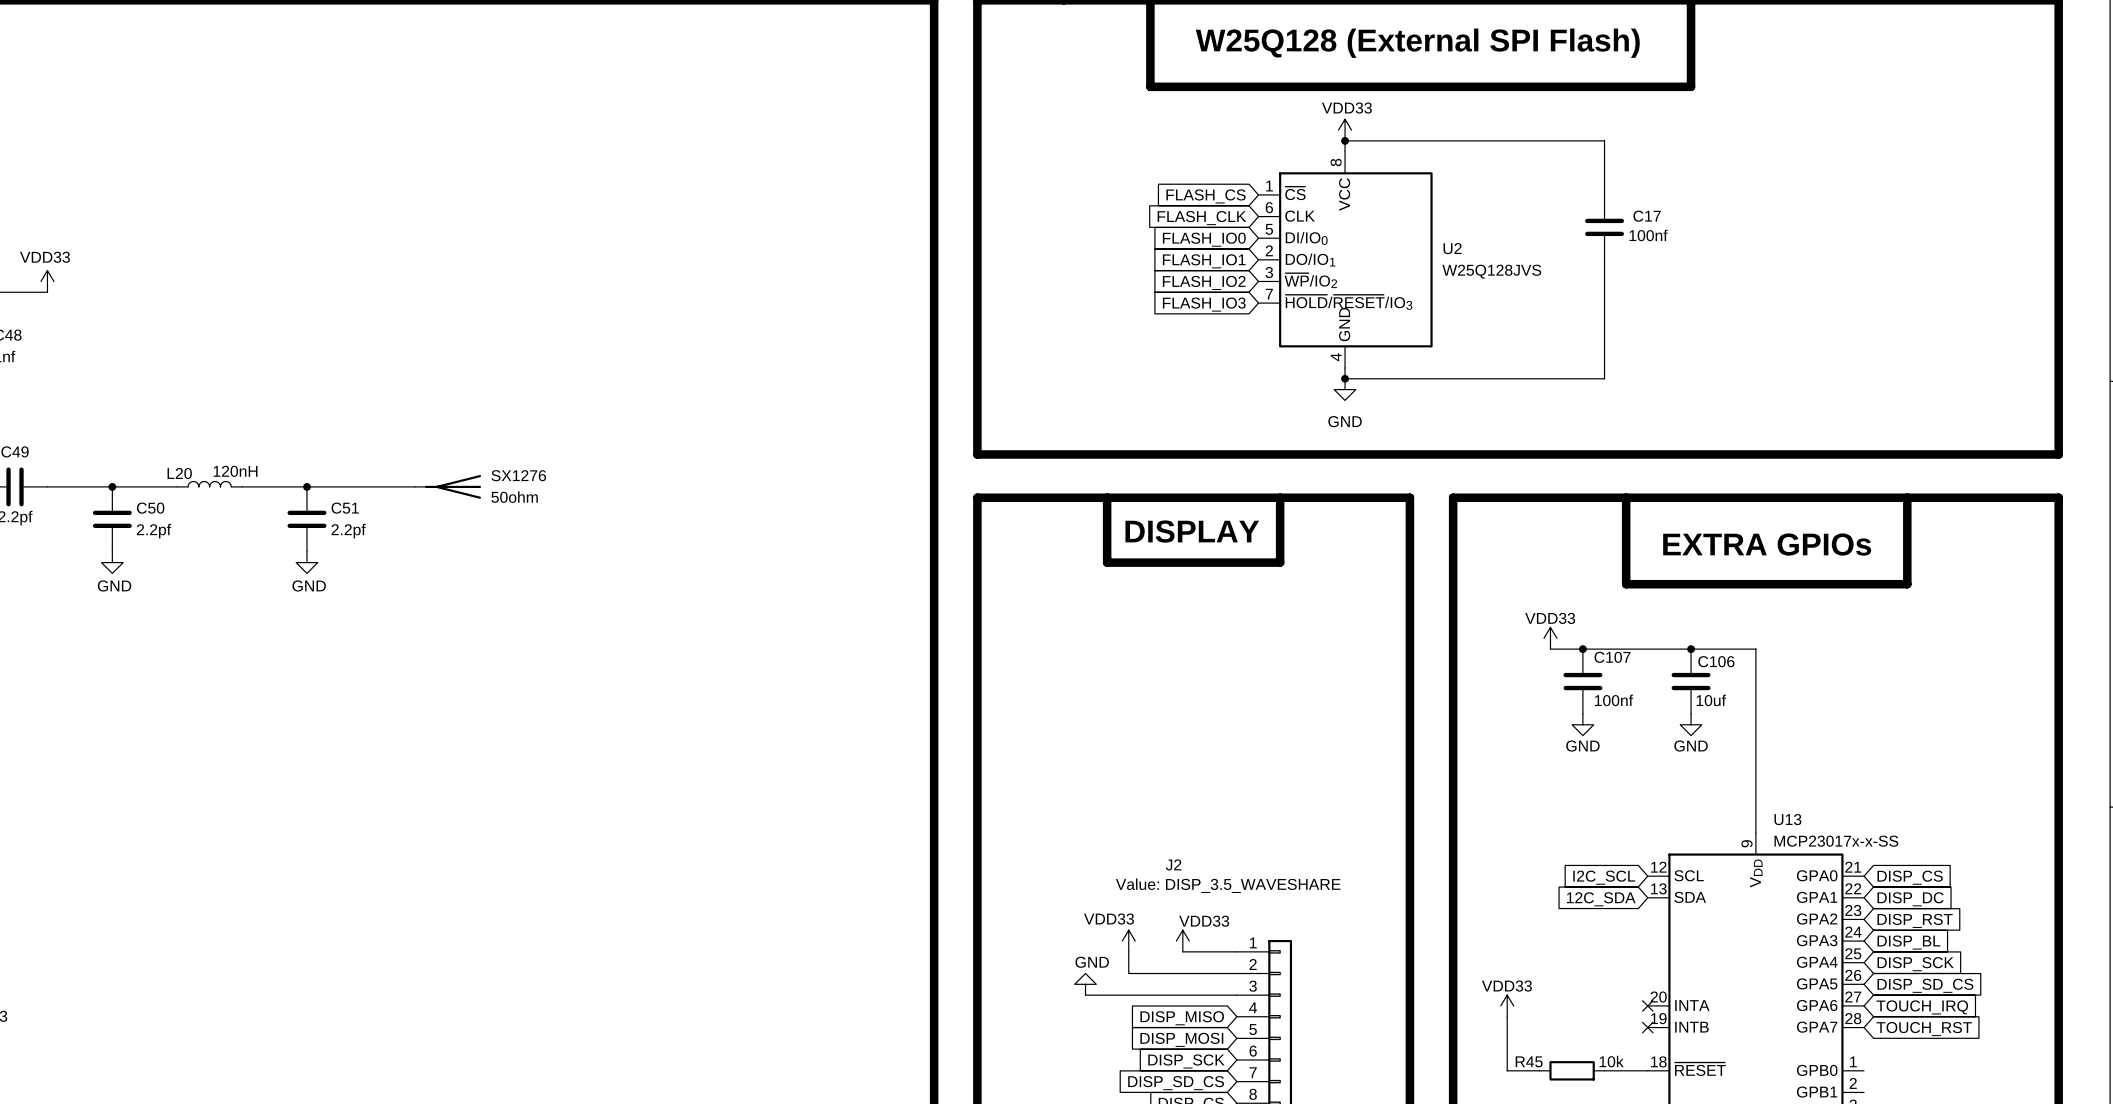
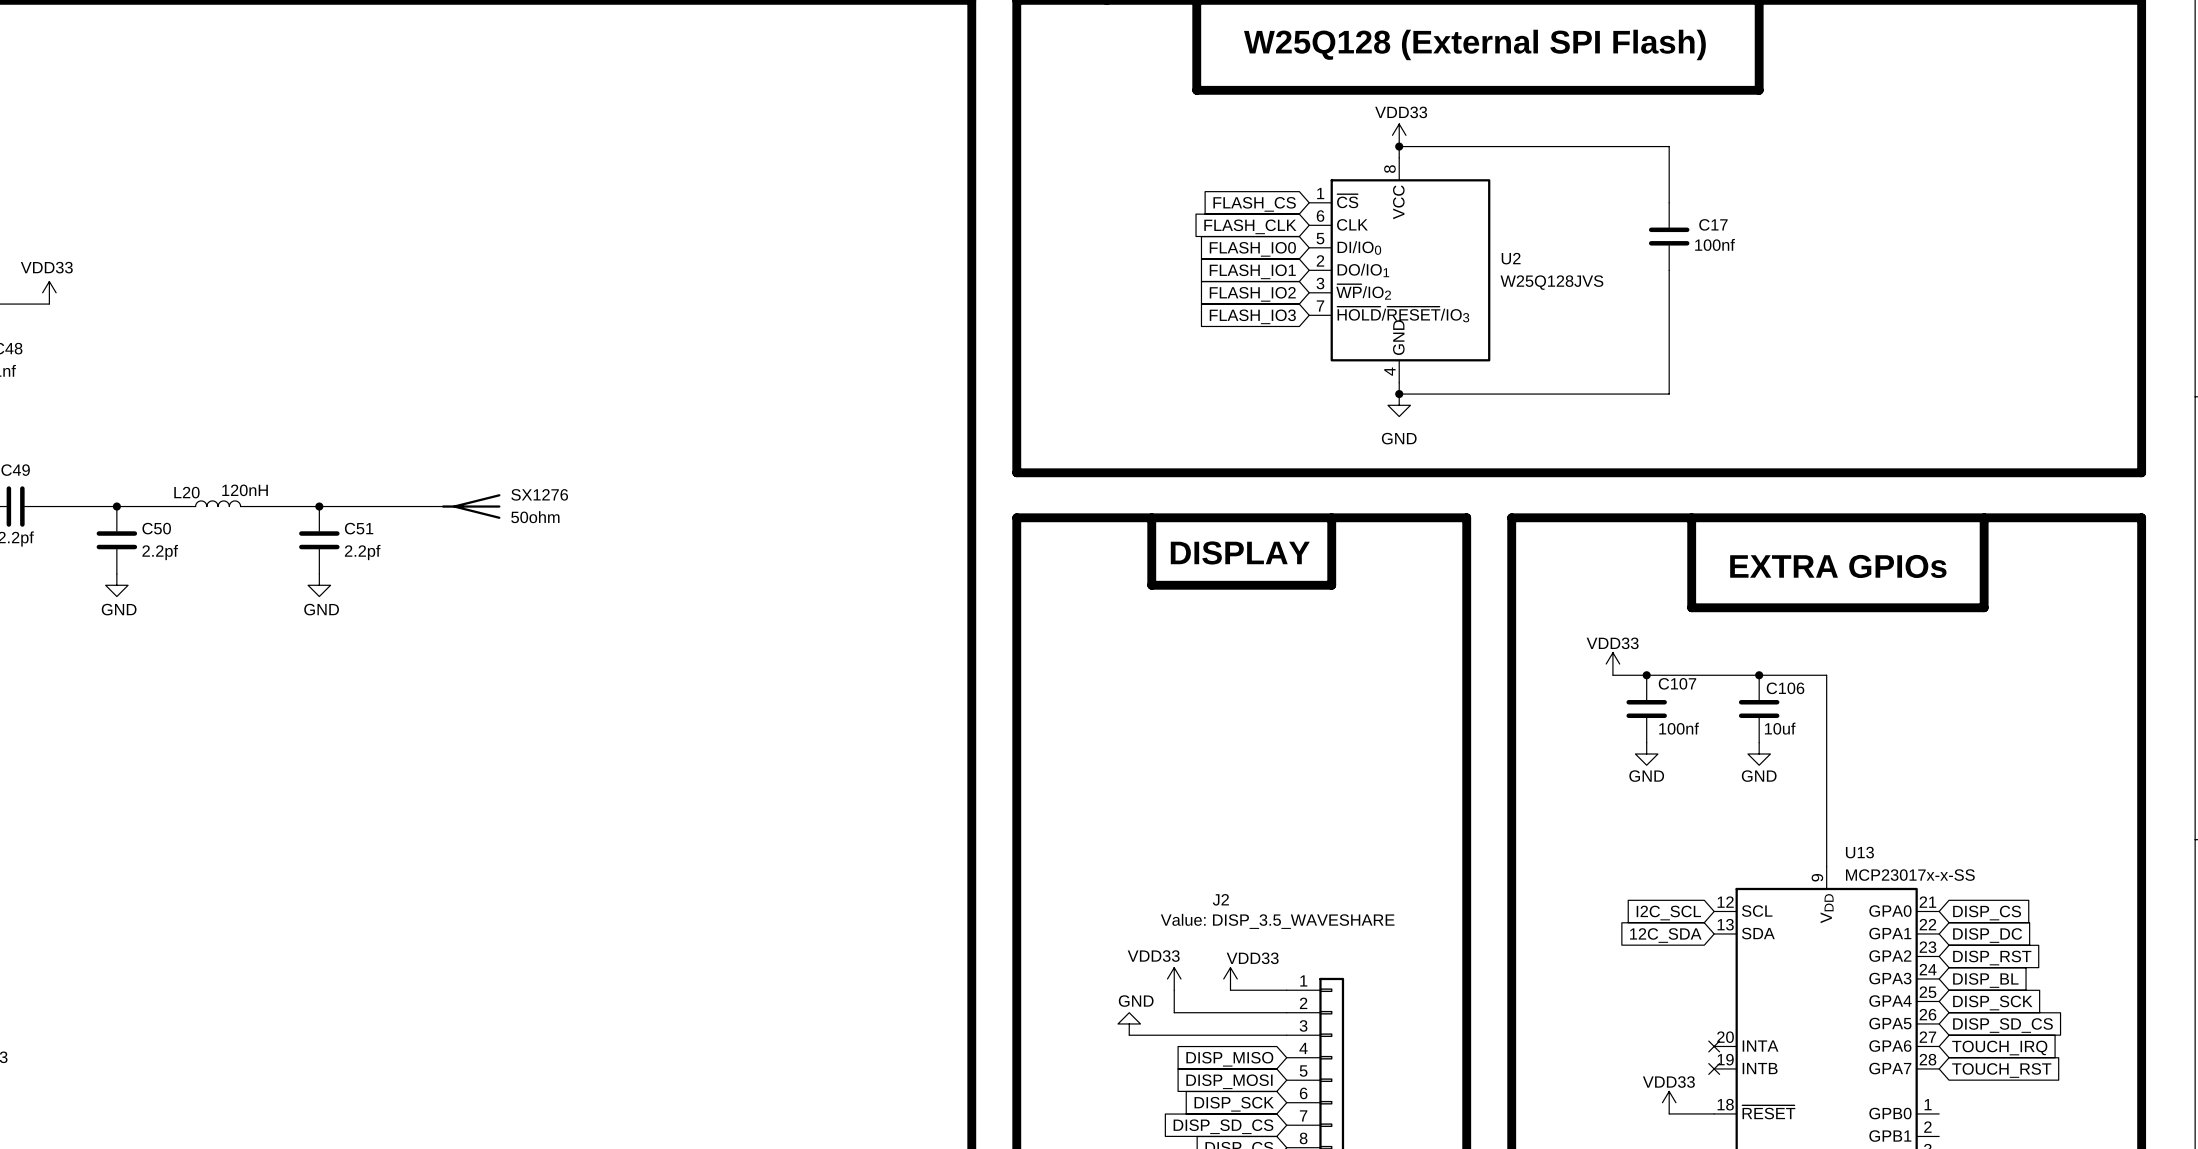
power symbol position: VDD33 (1507, 1005) -> VDD33 (1669, 1102)
wire: (1507, 1016) (1507, 1070) (1539, 1070) -> none
R45: 10k (1572, 1070) -> none

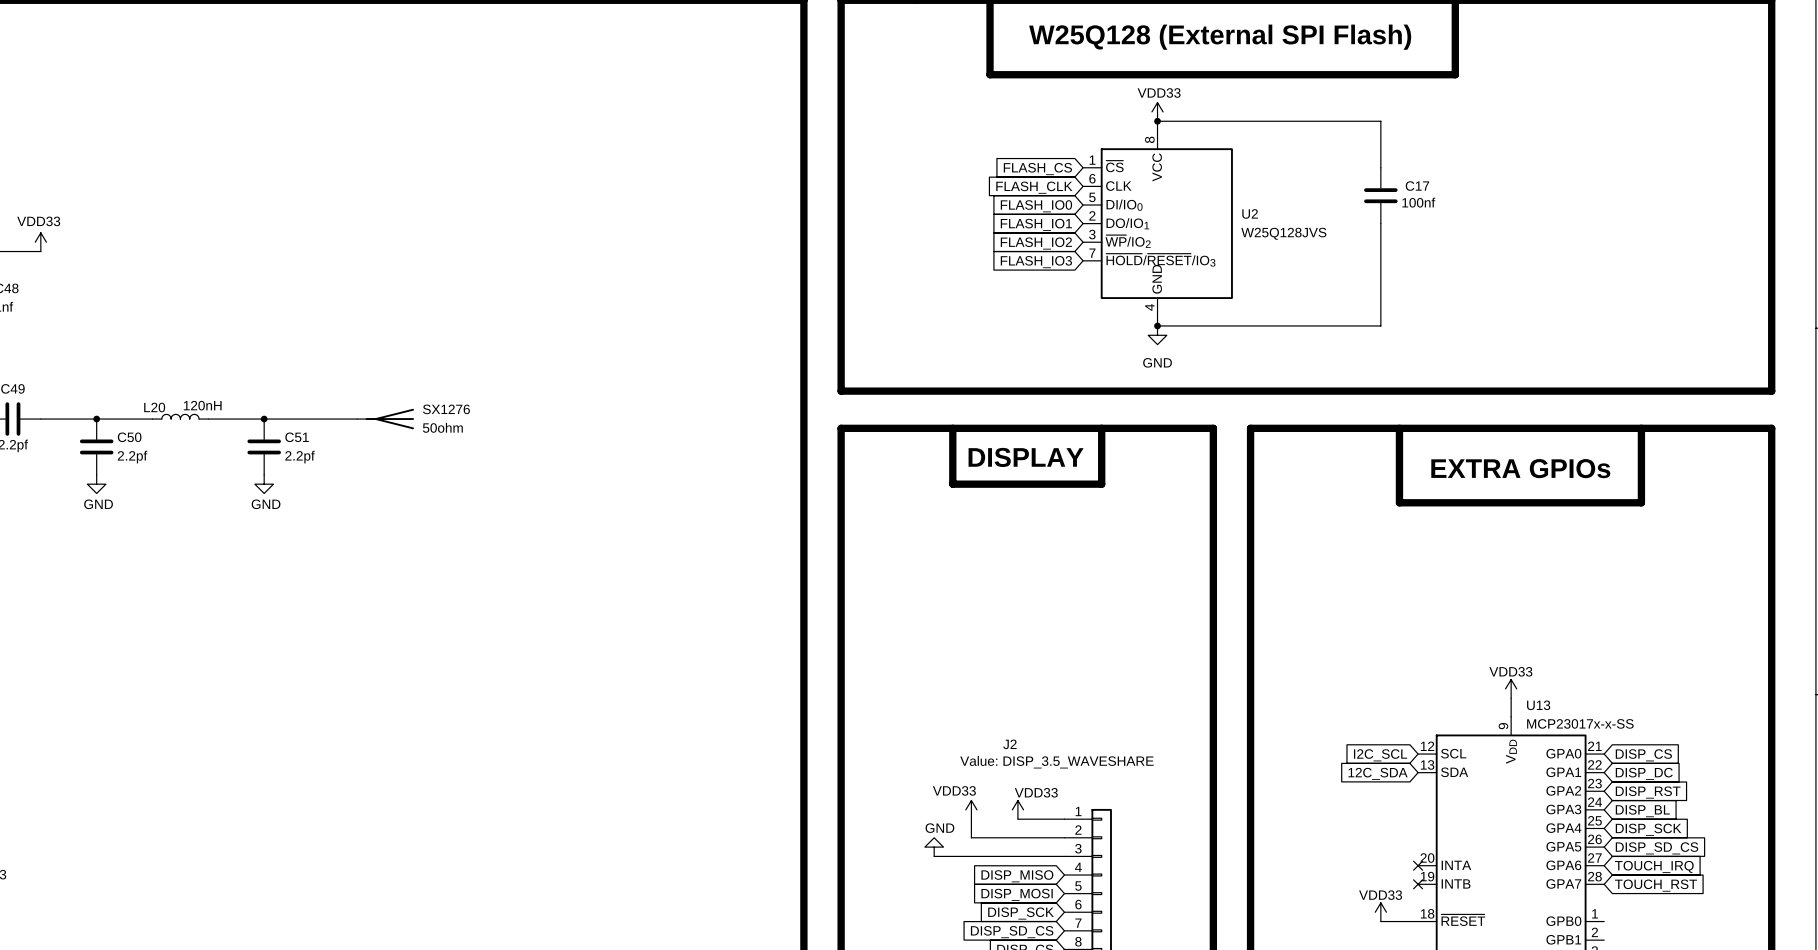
power symbol: VDD33 (1612, 664) -> none
wire: (1612, 675) (1826, 675) (1826, 843) -> none
junction: (1646, 675) -> none
junction: (1759, 675) -> none
C107: 100nf (1646, 709) -> none
C106: 10uf (1759, 709) -> none
power symbol: GND (1646, 754) -> none
power symbol: GND (1759, 754) -> none
power symbol: none -> VDD33 (1511, 688)

